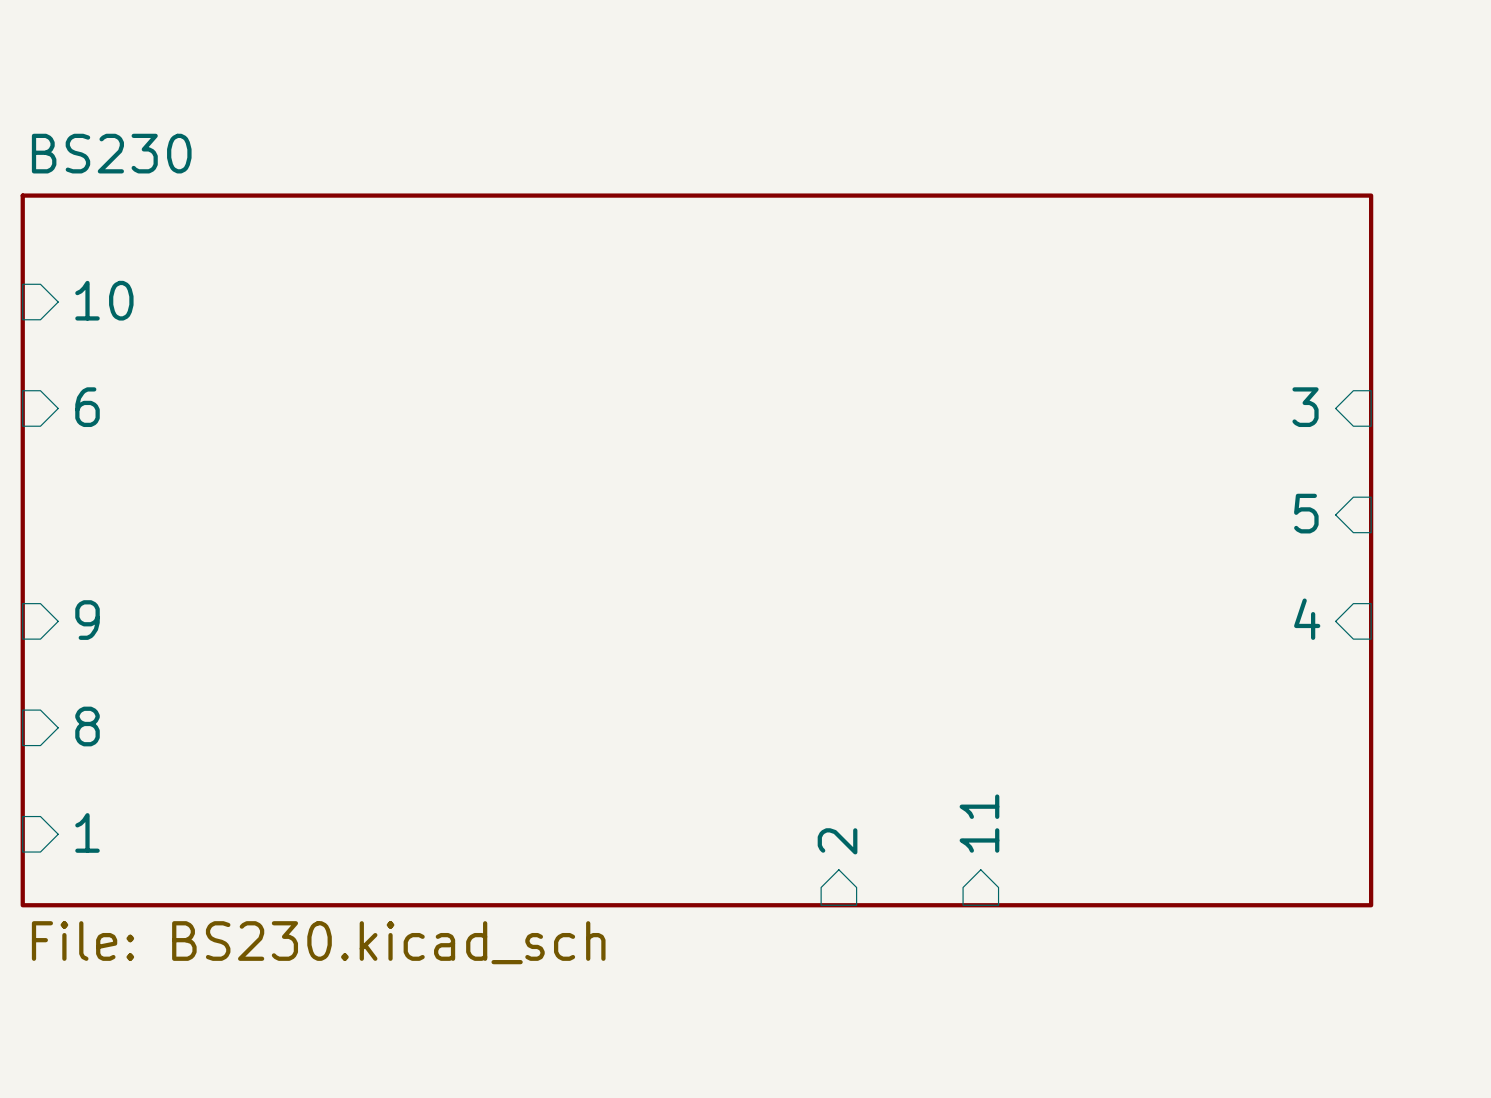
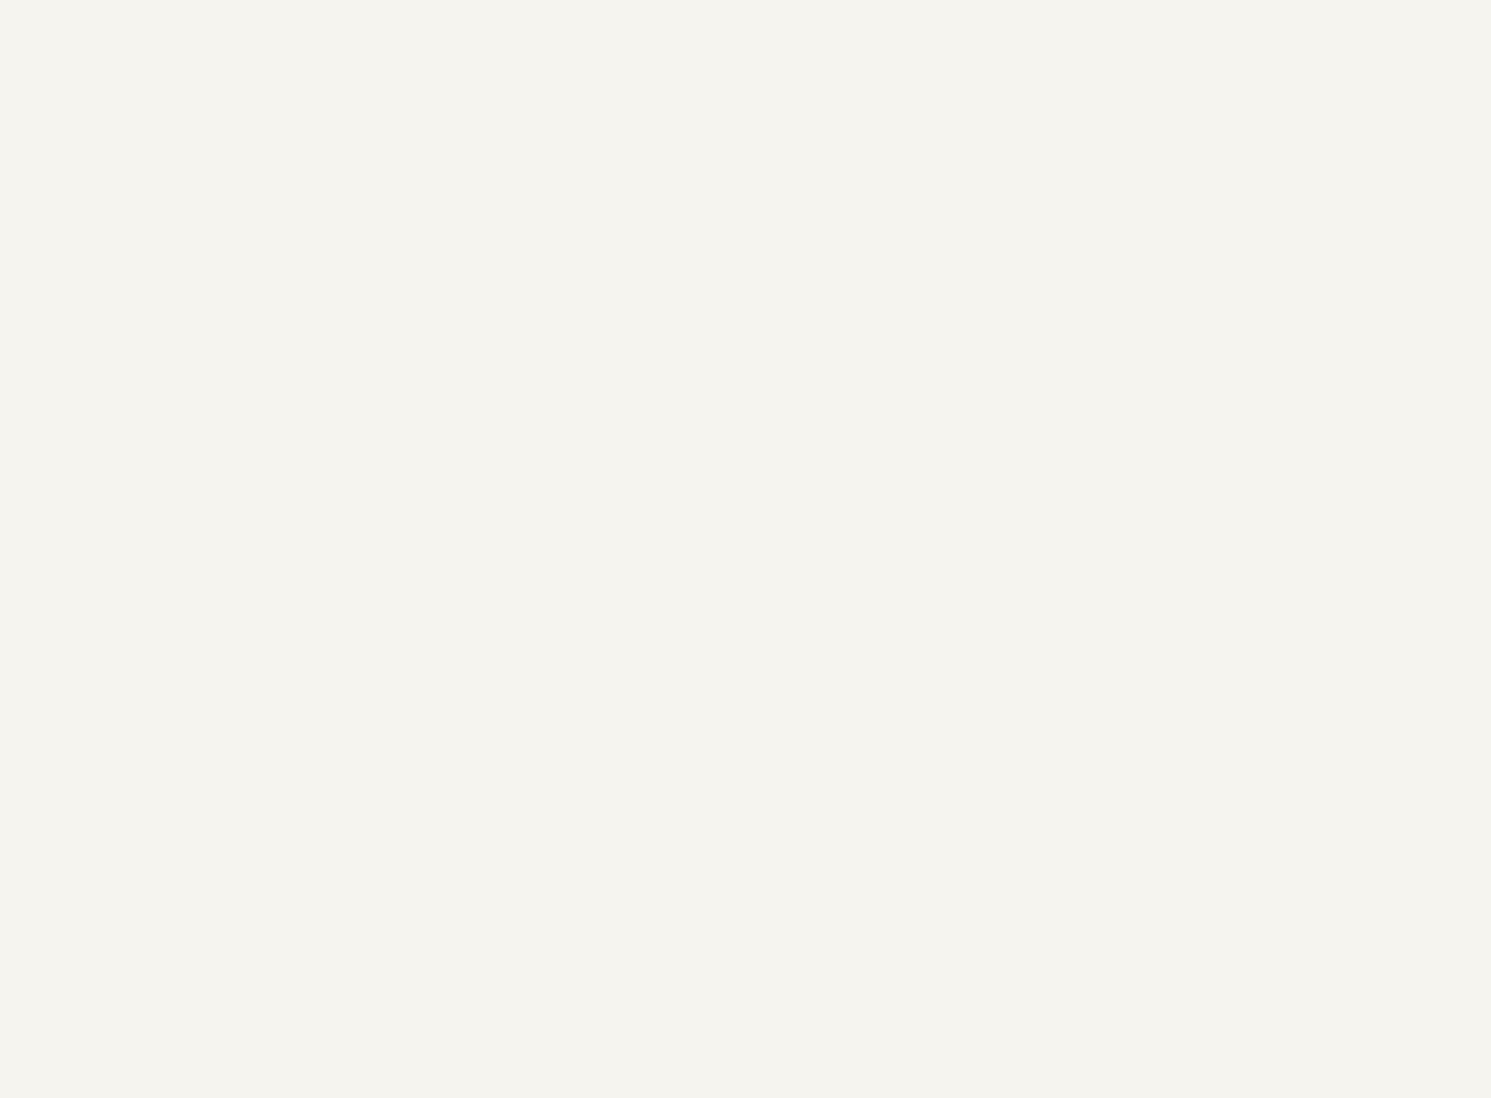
sheet pin: 10 (104, 300) -> none
sheet pin: 6 (87, 407) -> none
sheet pin: 3 (1305, 407) -> none
sheet pin: 5 (1306, 513) -> none
sheet BS230: File: BS230.kicad_sch (696, 550) -> none
sheet pin: 4 (1307, 619) -> none
sheet pin: 9 (87, 620) -> none
sheet pin: 8 (87, 726) -> none
sheet pin: 11 (979, 823) -> none
sheet pin: 1 (87, 832) -> none
sheet pin: 2 (837, 841) -> none

